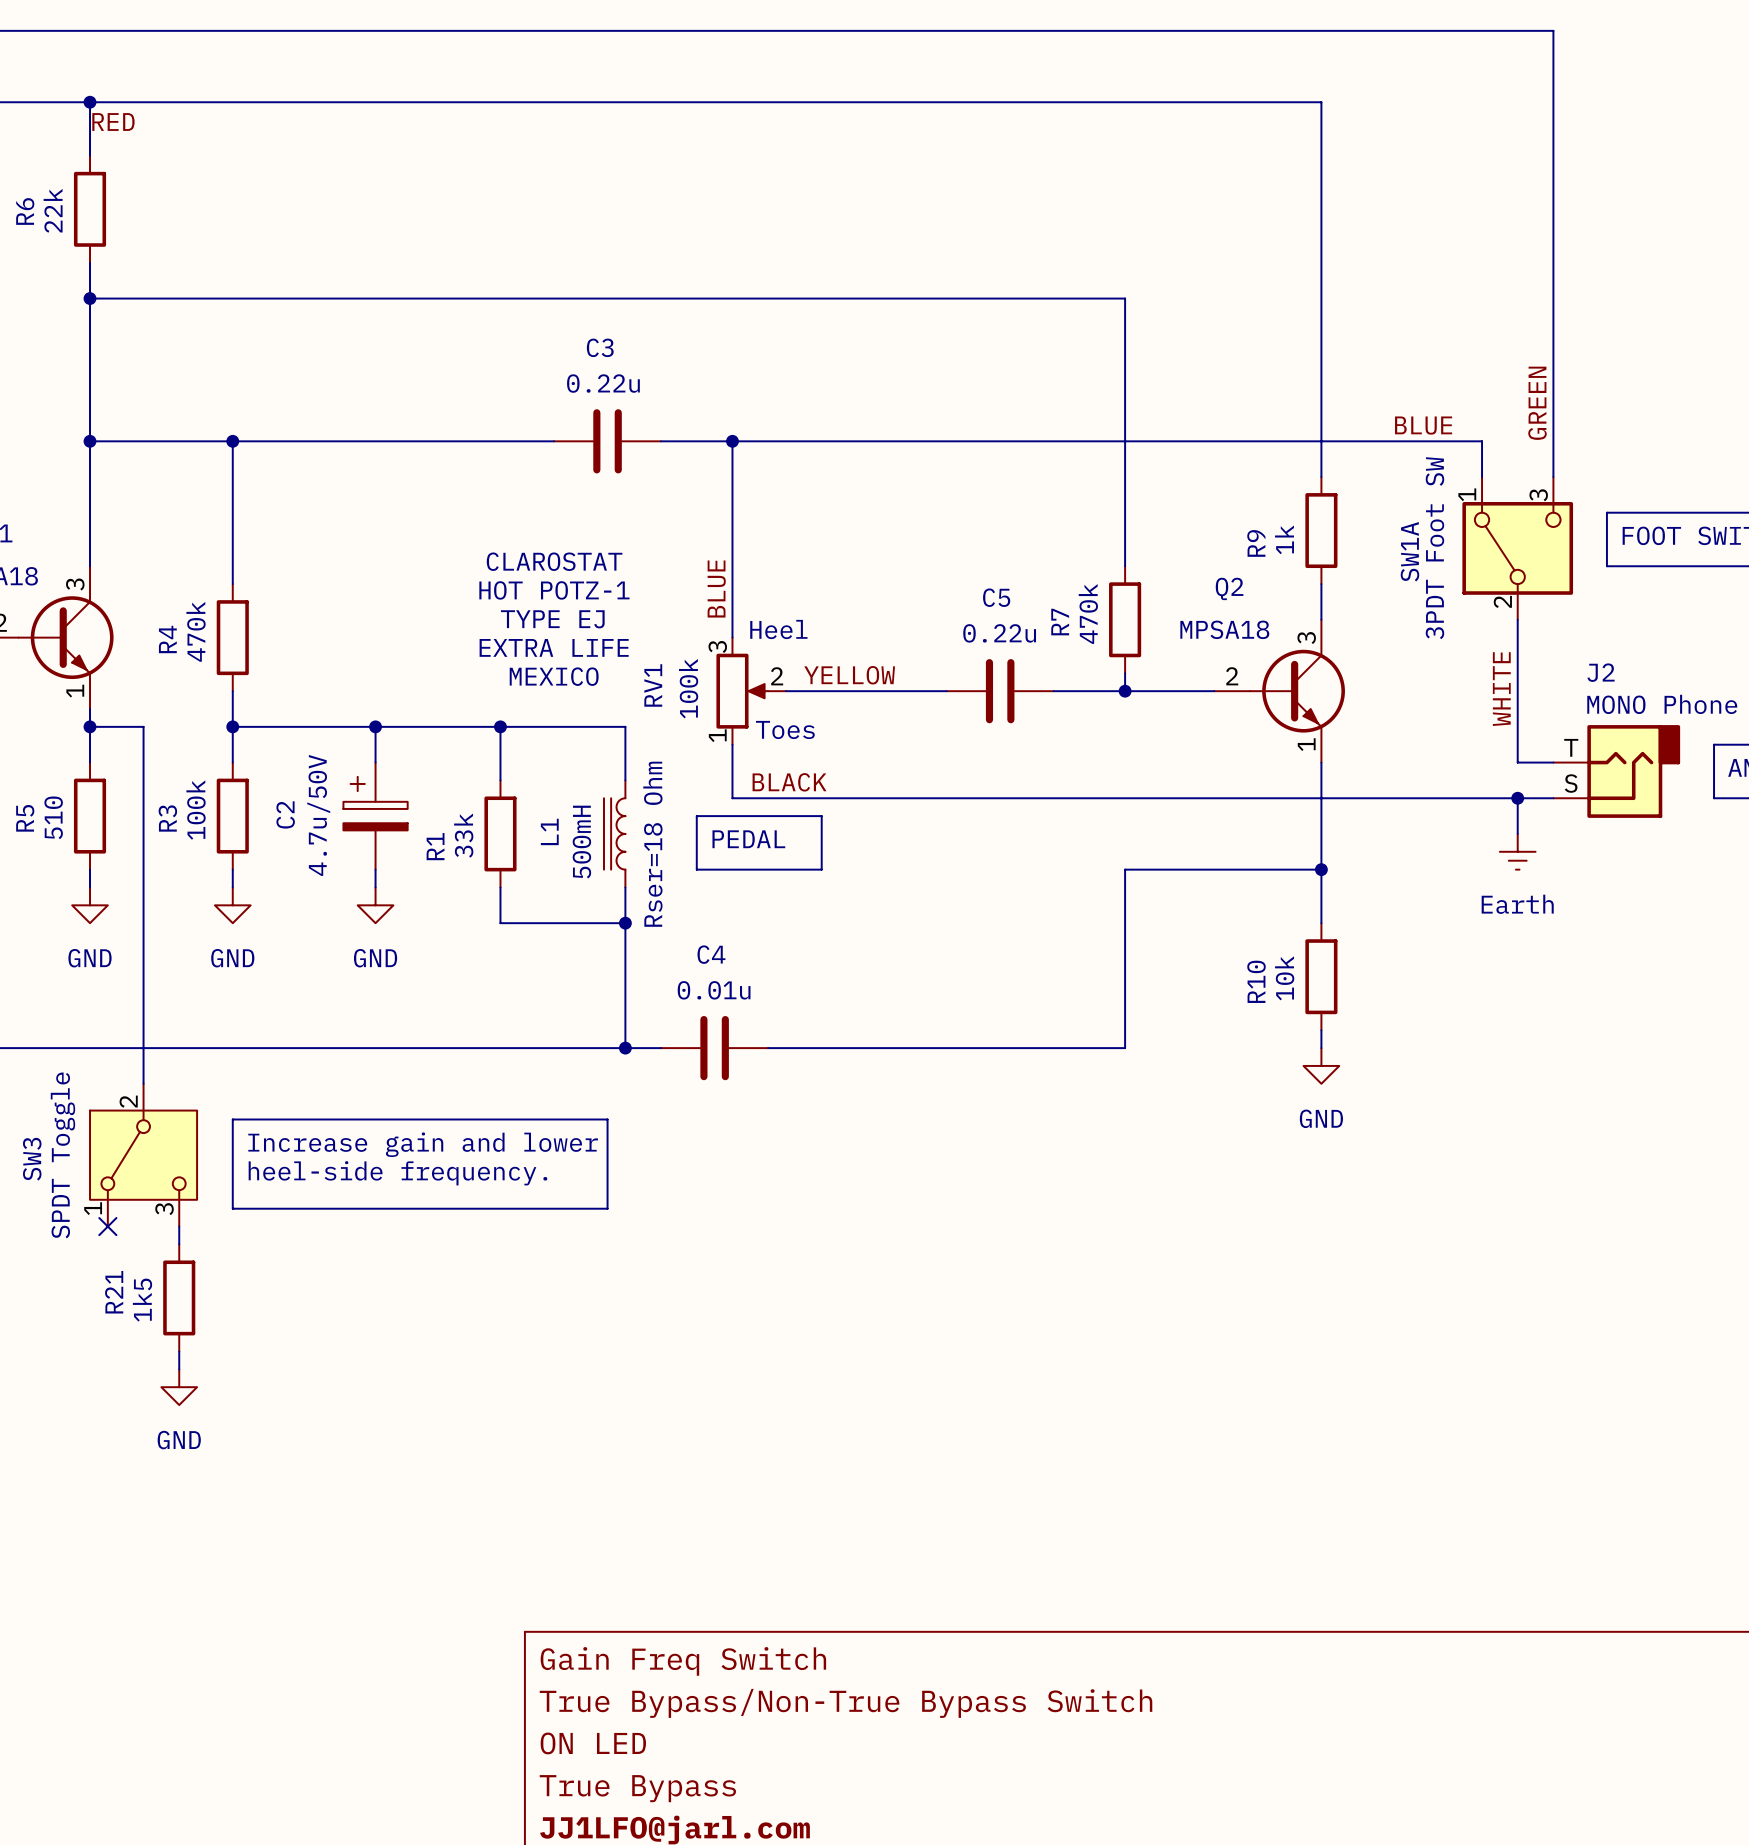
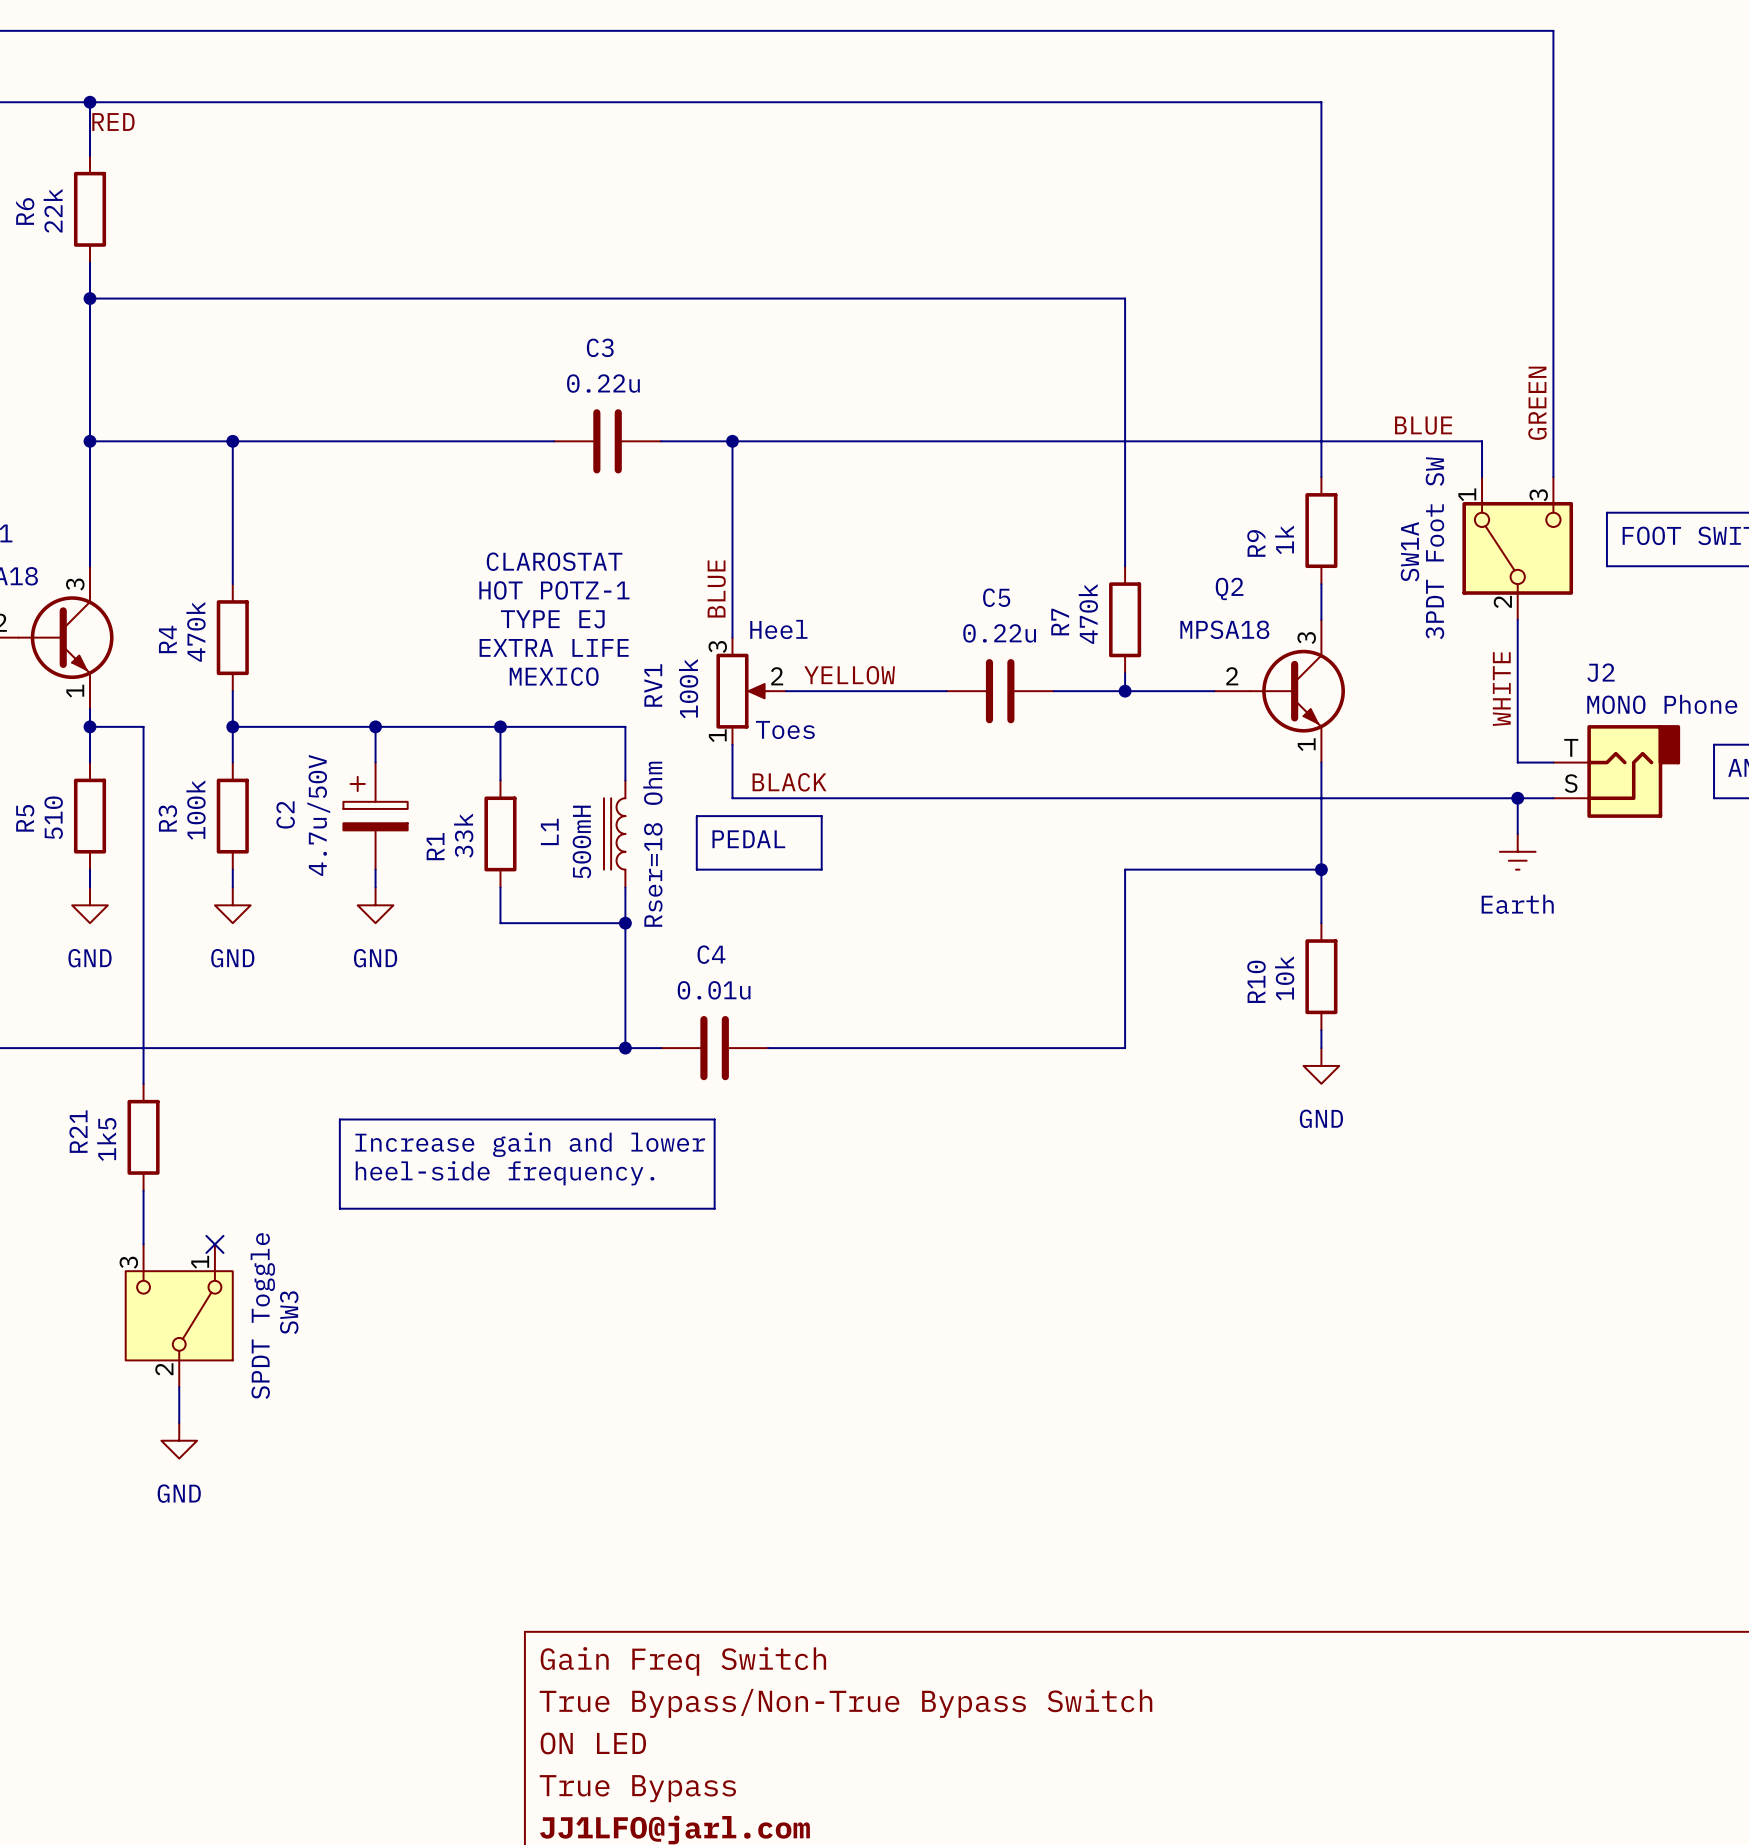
line: (339, 1119) (232, 1119) (232, 1208) (339, 1208) -> (339, 1119) (339, 1208)
line: (607, 1119) (607, 1208) -> (607, 1119) (714, 1119) (714, 1208) (607, 1208)
text position: Increase gain and lower (423, 1144) -> Increase gain and lower (530, 1144)
SW3 rotation: 0° (143, 1155) -> 180° (179, 1315)
SW3 position: (143, 1155) -> (179, 1315)
text position: heel-side frequency. (397, 1173) -> heel-side frequency. (505, 1173)
wire: none -> (143, 1190) (143, 1244)
no-connect mark: (107, 1226) -> none
wire: (179, 1226) (179, 1244) -> none
no-connect mark: none -> (214, 1244)
R21 position: (179, 1297) -> (143, 1137)
wire: none -> (179, 1387) (179, 1422)
power symbol position: GND (179, 1387) -> GND (179, 1440)

